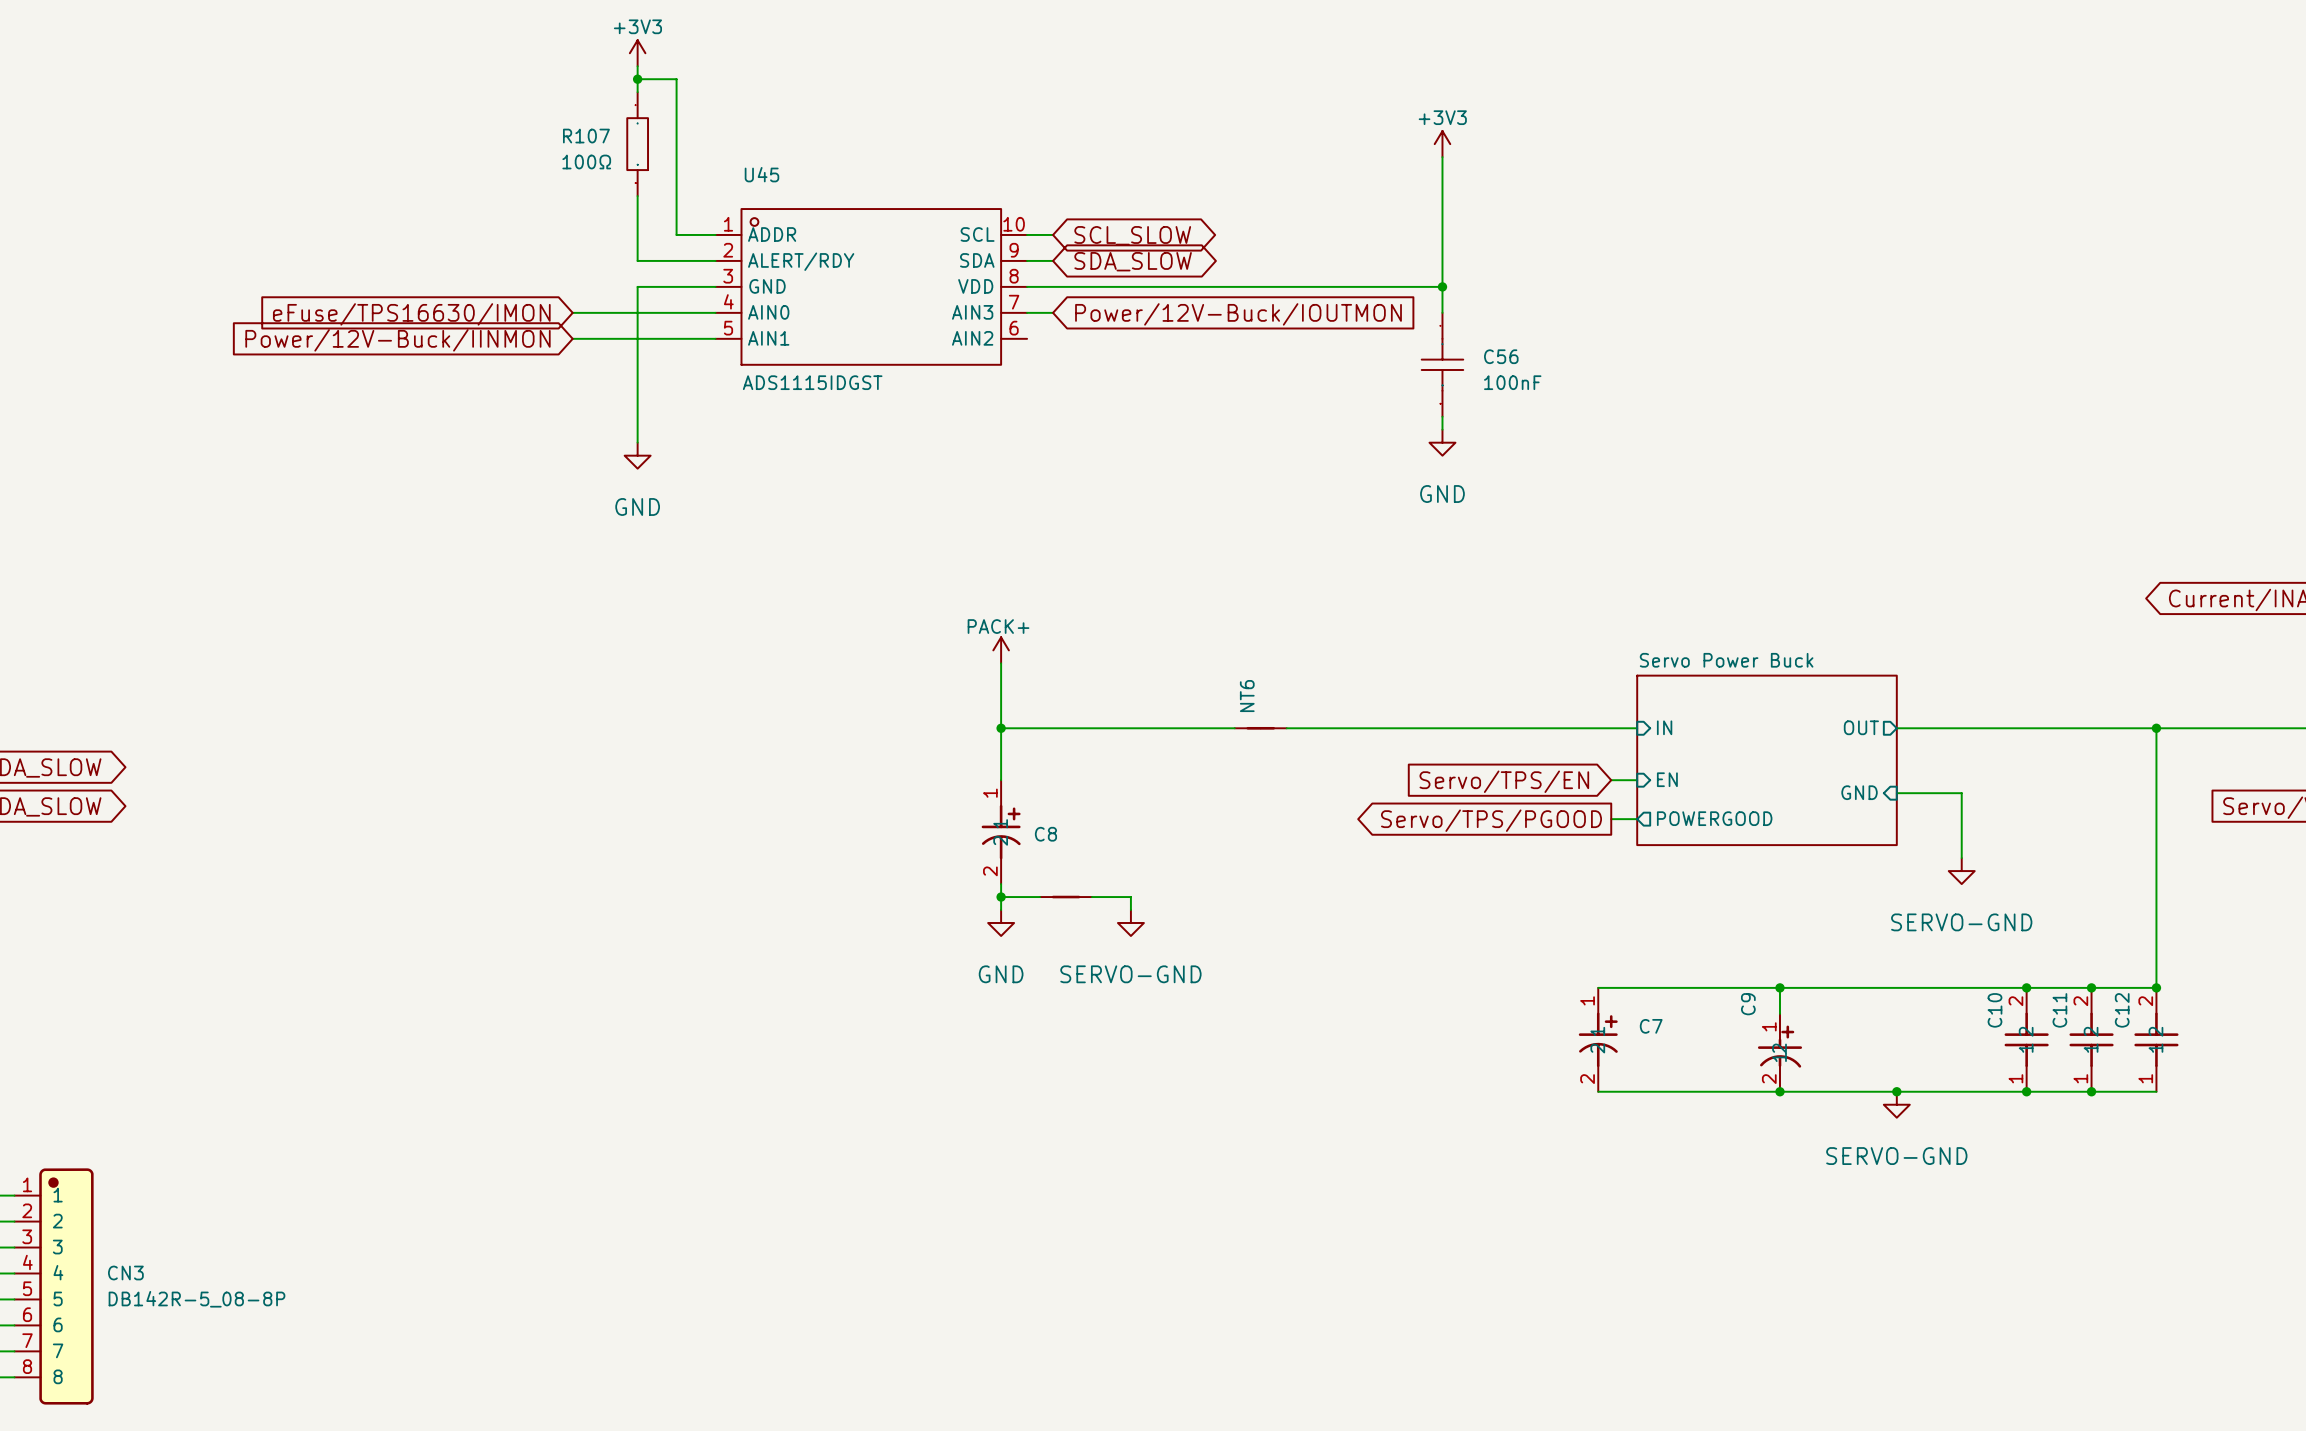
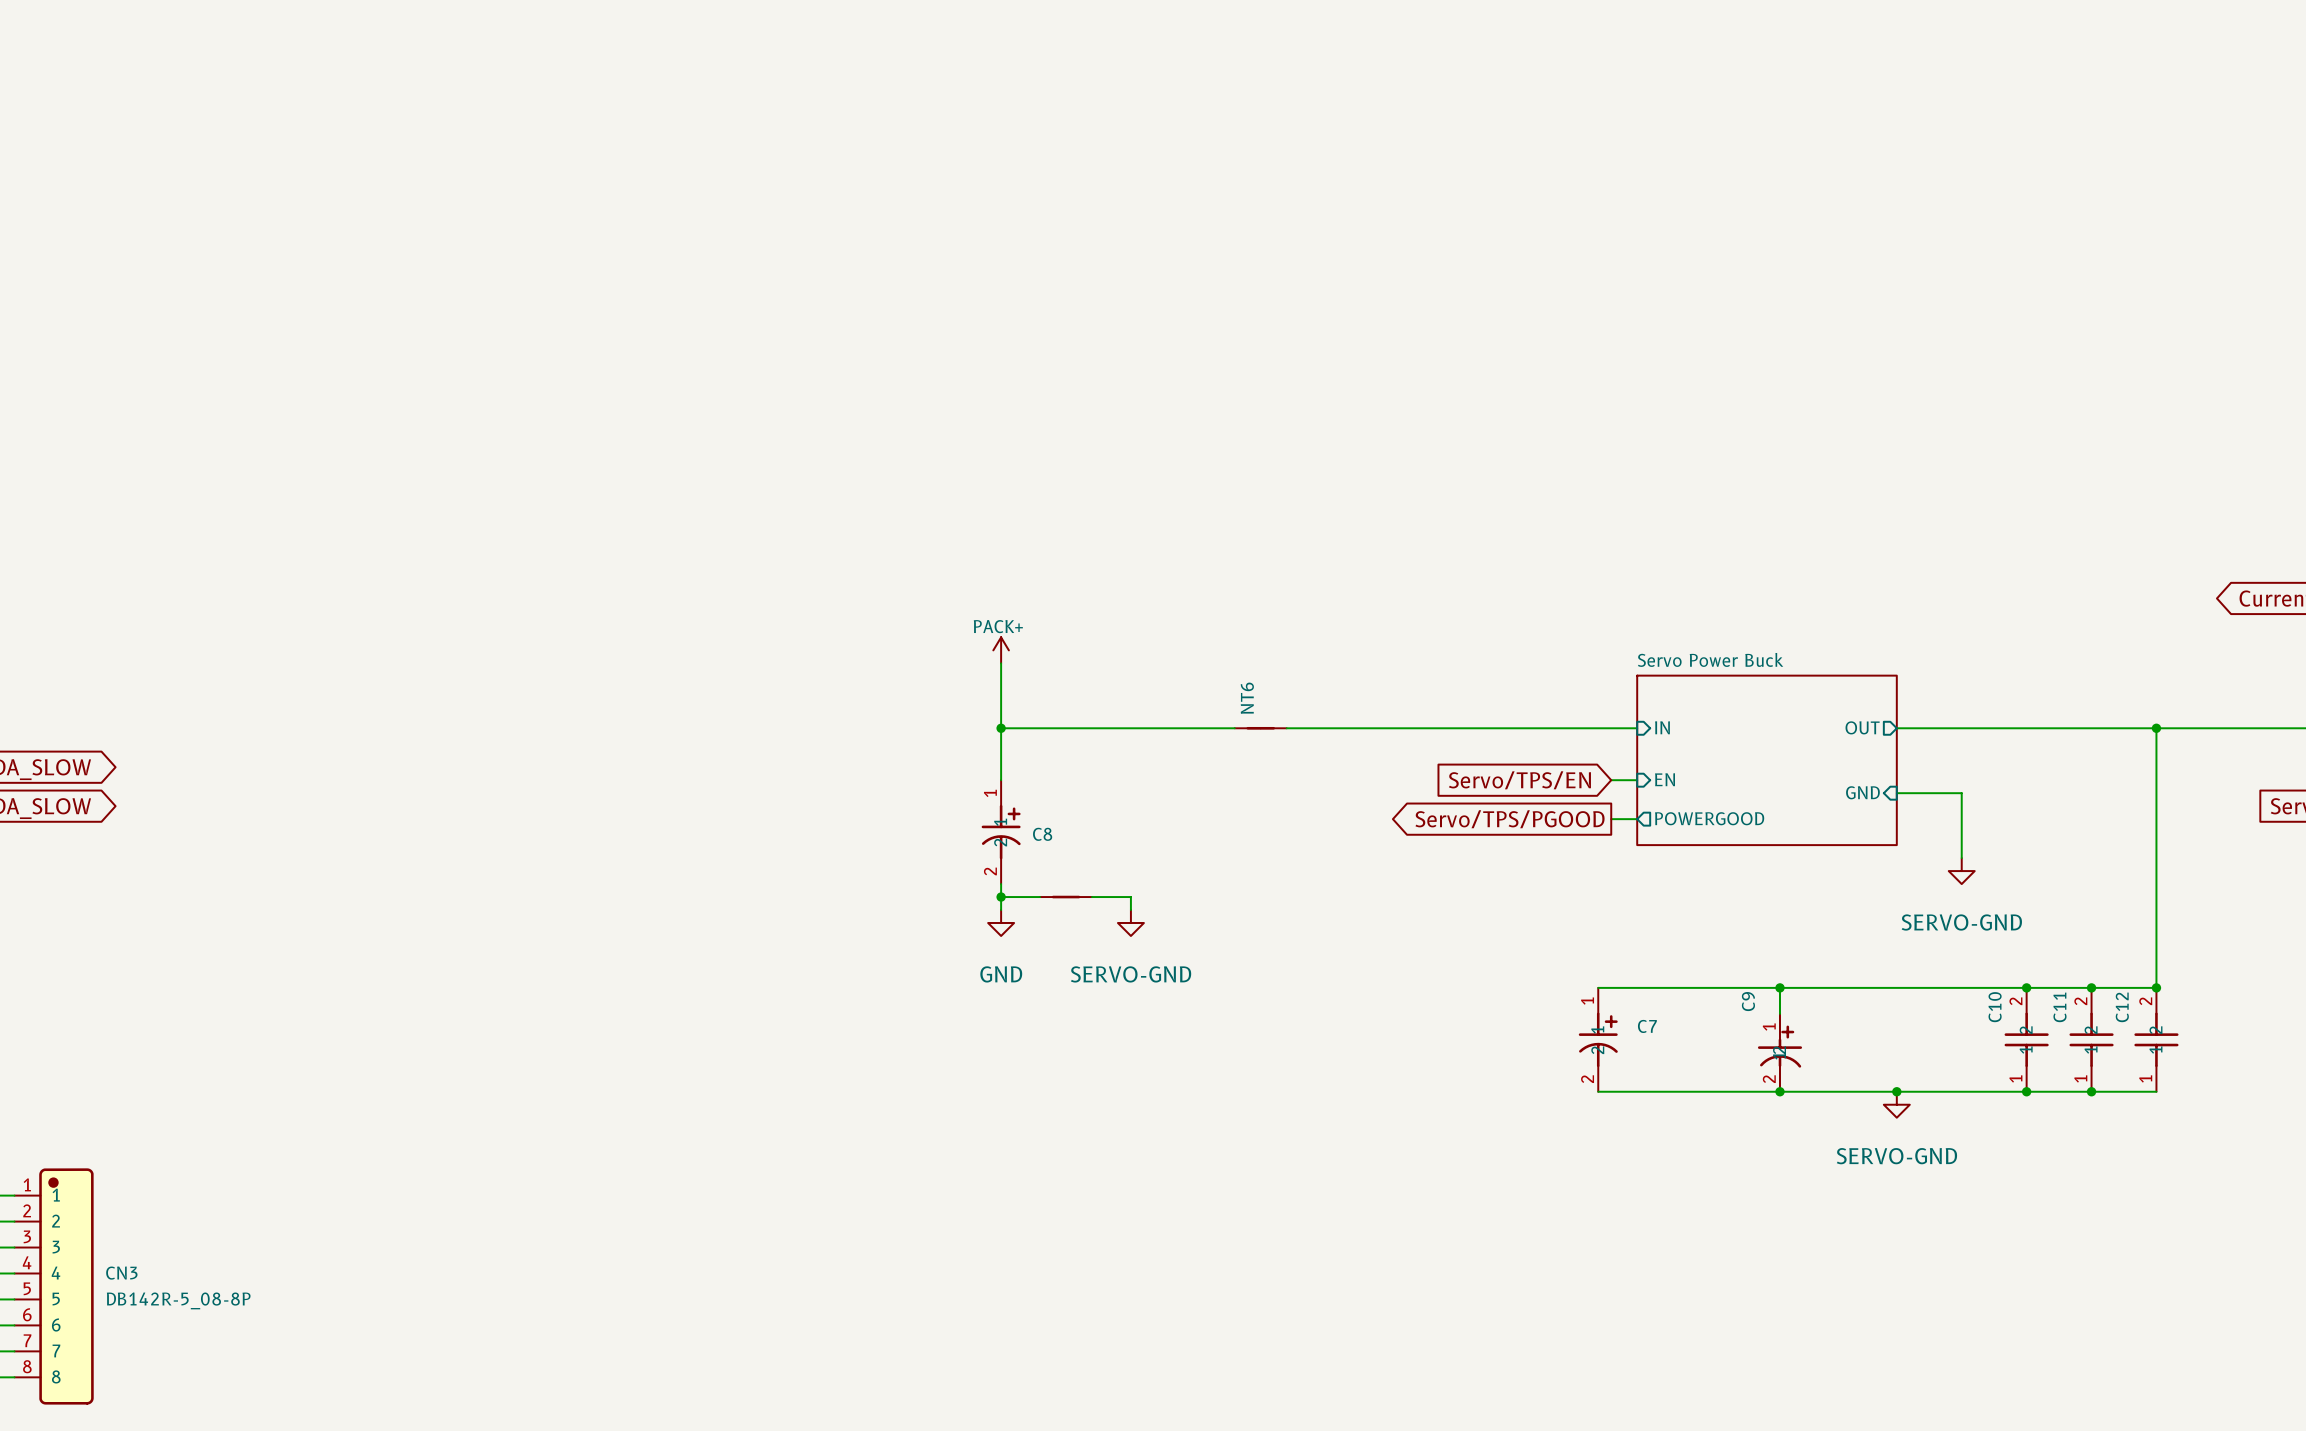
power symbol: +3V3 (637, 53) -> none
wire: (637, 66) (637, 92) -> none
wire: (637, 79) (676, 79) (676, 234) (715, 234) -> none
junction: (637, 79) -> none
R107: 100Ω (637, 144) -> none
power symbol: +3V3 (1442, 144) -> none
wire: (1442, 157) (1442, 312) -> none
wire: (637, 196) (637, 260) (715, 260) -> none
wire: (1027, 234) (1053, 234) -> none
global label: SCL_SLOW (1132, 235) -> none
wire: (1027, 260) (1053, 260) -> none
global label: SDA_SLOW (1133, 261) -> none
wire: (715, 286) (637, 286) (637, 442) -> none
U45: ADS1115IDGST (871, 286) -> none
wire: (1027, 286) (1442, 286) -> none
junction: (1442, 286) -> none
wire: (572, 312) (715, 312) -> none
wire: (1027, 312) (1053, 312) -> none
global label: eFuse/TPS16630/IMON (411, 314) -> none
global label: Power/12V-Buck/IOUTMON (1238, 314) -> none
wire: (572, 338) (715, 338) -> none
global label: Power/12V-Buck/IINMON (397, 340) -> none
C56: 100nF (1442, 364) -> none
wire: (1442, 416) (1442, 429) -> none
power symbol: GND (1442, 442) -> none
power symbol: GND (637, 455) -> none

